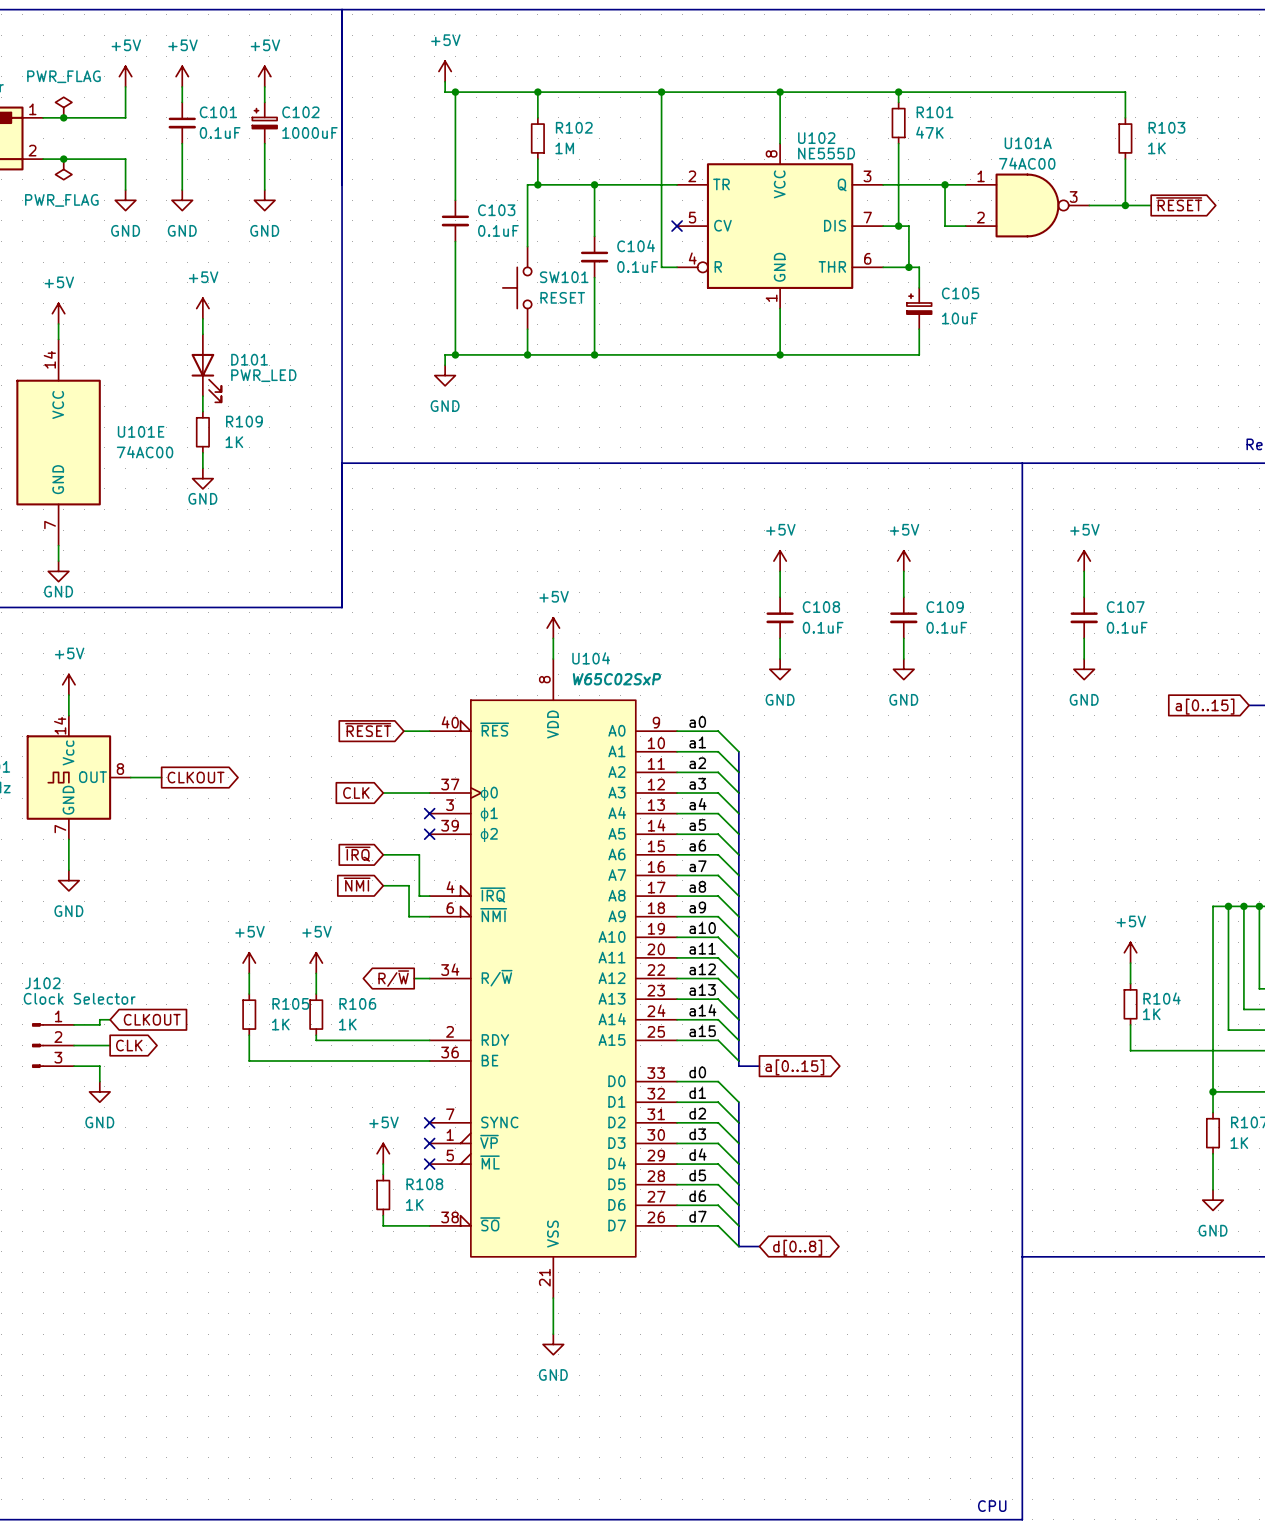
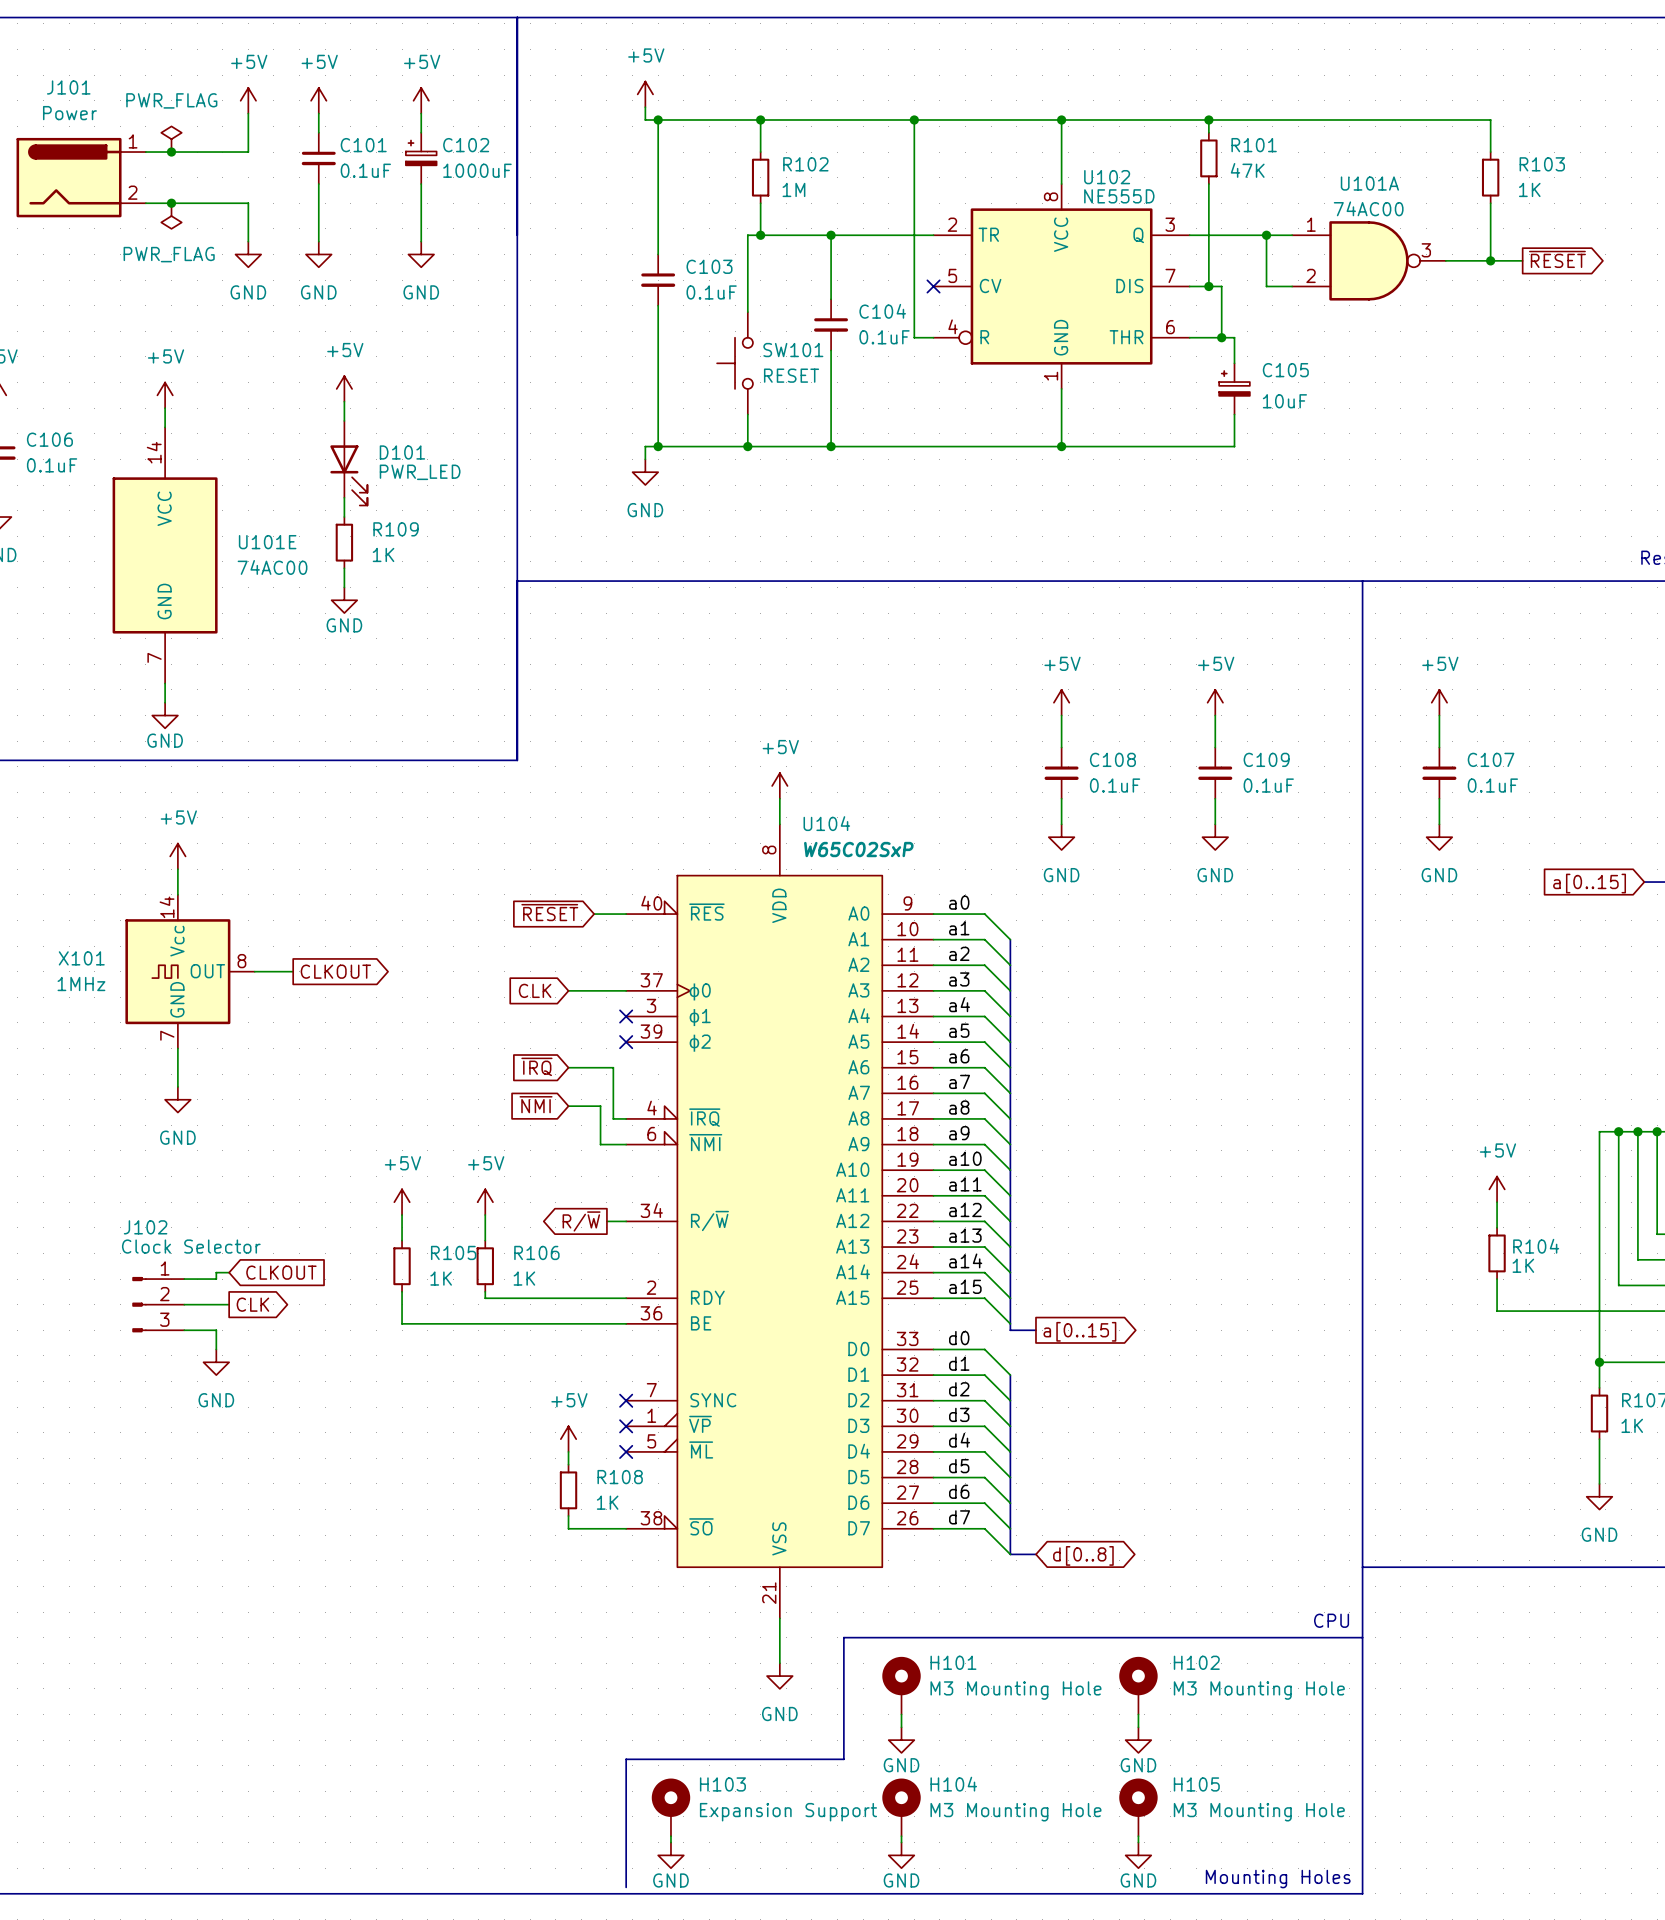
text: none -> CPU (1331, 1620)
line: none -> (1362, 1637) (843, 1637) (843, 1759) (626, 1759) (626, 1887)
H101: none -> M3 Mounting Hole (901, 1685)
H102: none -> M3 Mounting Hole (1138, 1685)
wire: none -> (901, 1714) (901, 1727)
wire: none -> (1138, 1714) (1138, 1727)
power symbol: none -> GND (901, 1740)
power symbol: none -> GND (1138, 1740)
H103: none -> Expansion Support (670, 1807)
H104: none -> M3 Mounting Hole (901, 1807)
H105: none -> M3 Mounting Hole (1138, 1807)
wire: none -> (670, 1836) (670, 1842)
wire: none -> (901, 1836) (901, 1842)
wire: none -> (1138, 1836) (1138, 1842)
power symbol: none -> GND (670, 1855)
power symbol: none -> GND (901, 1855)
power symbol: none -> GND (1138, 1855)
text: CPU (992, 1506) -> none
text: none -> Mounting Holes (1278, 1879)

